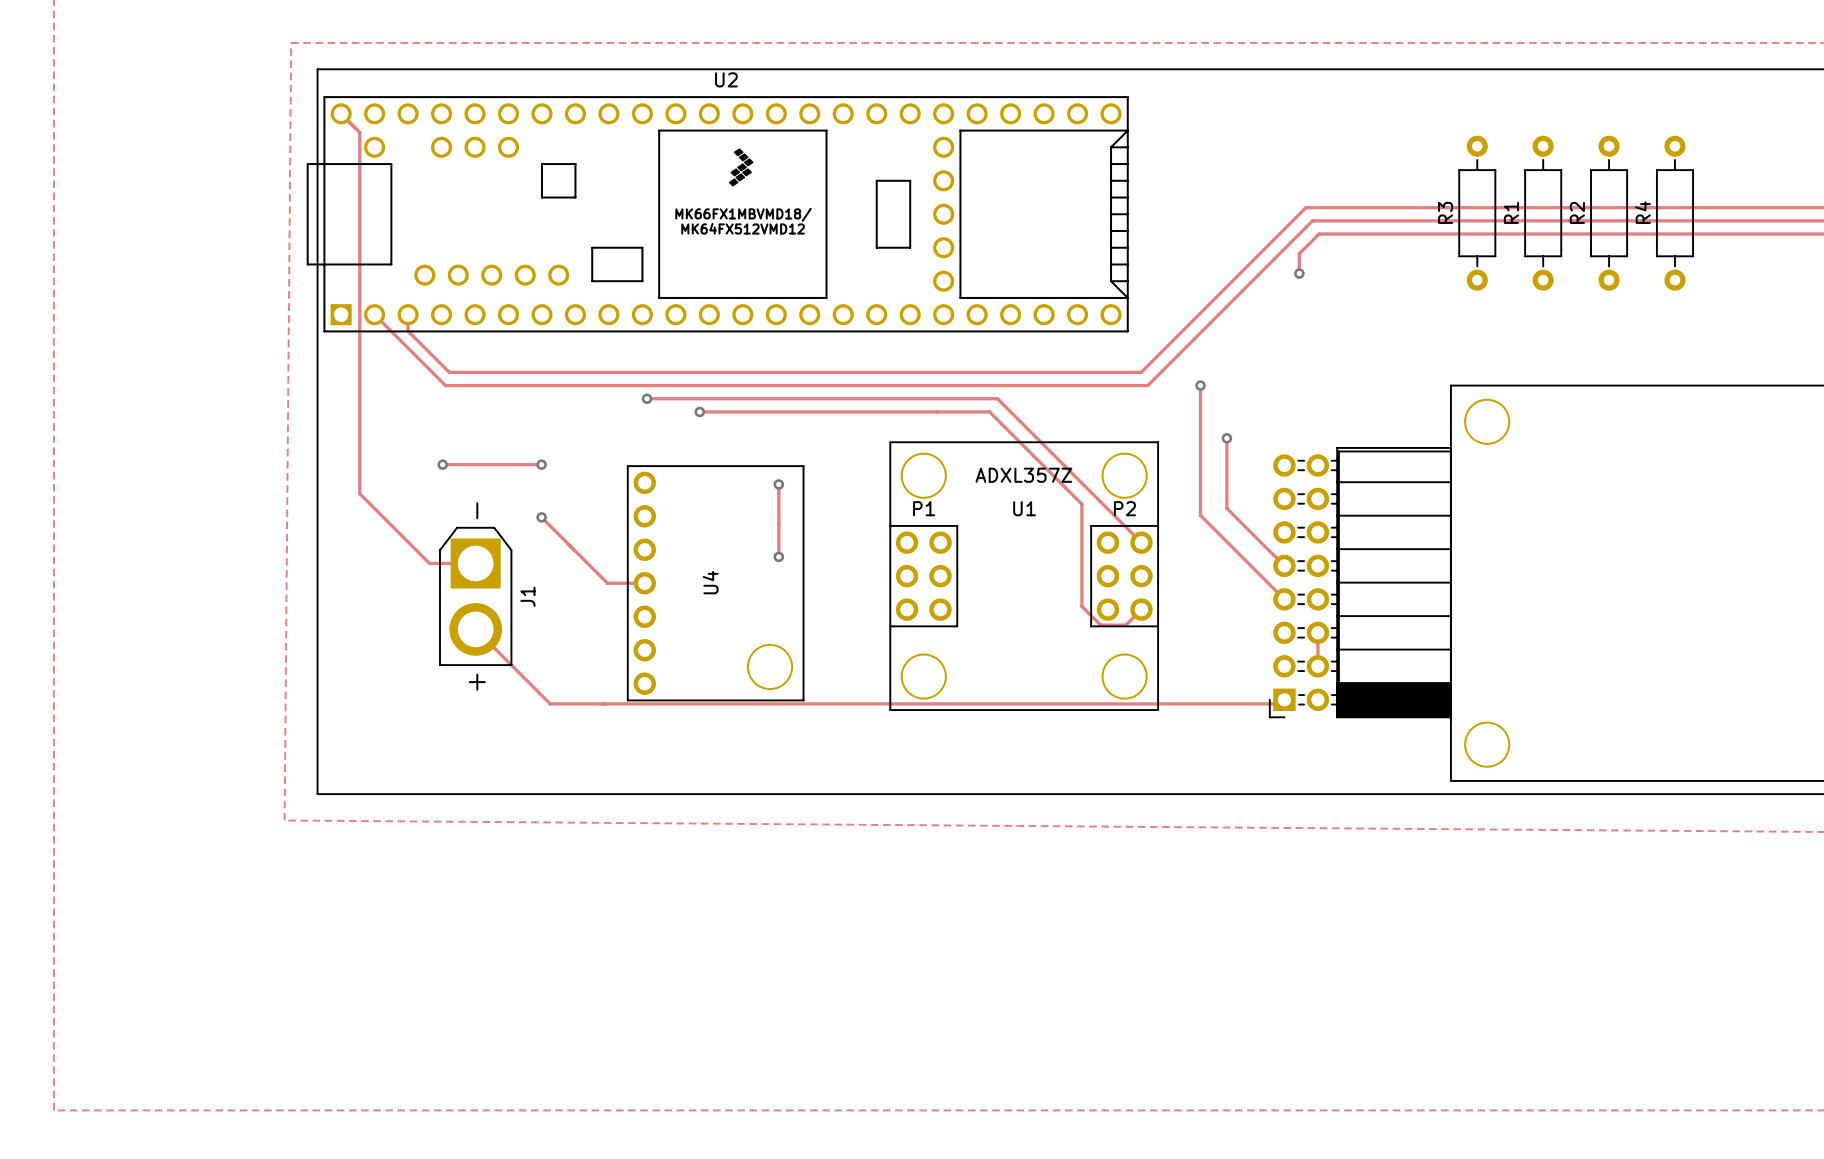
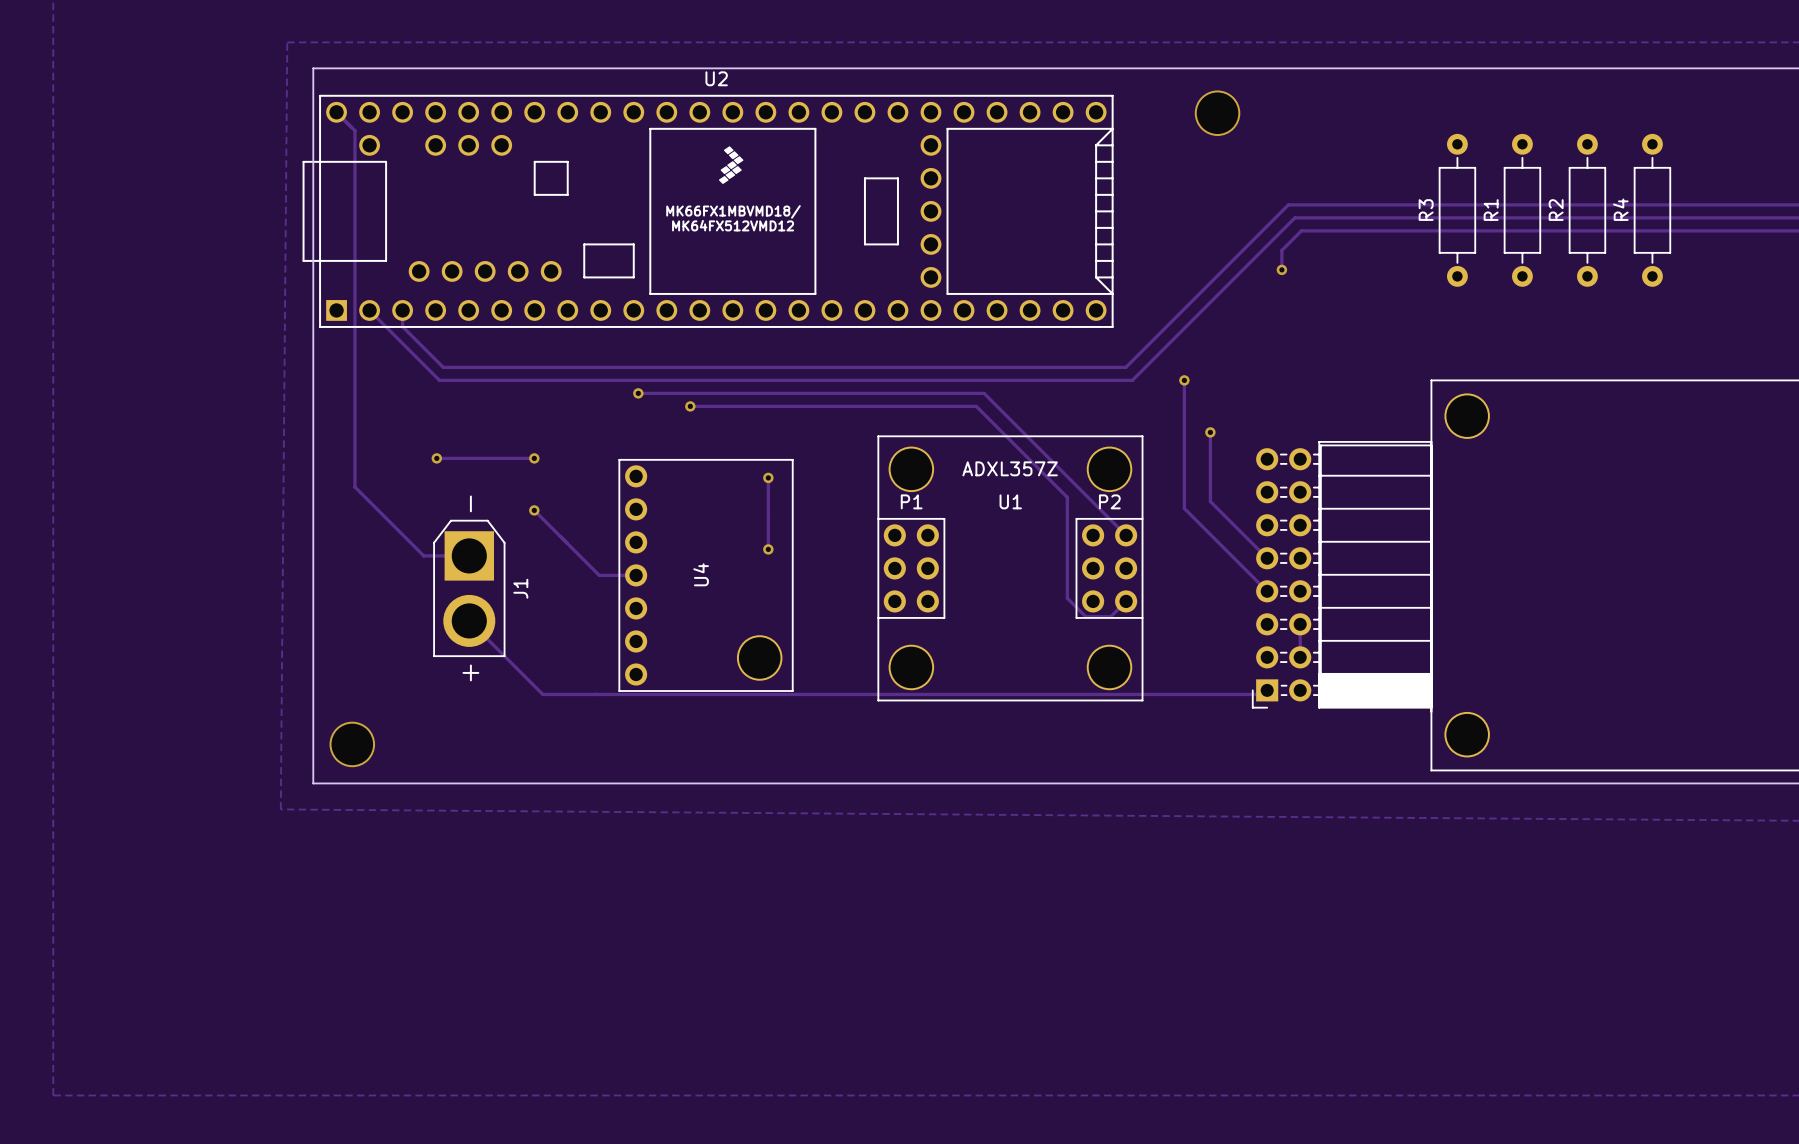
via: none -> (1217, 113)
via: none -> (352, 744)

